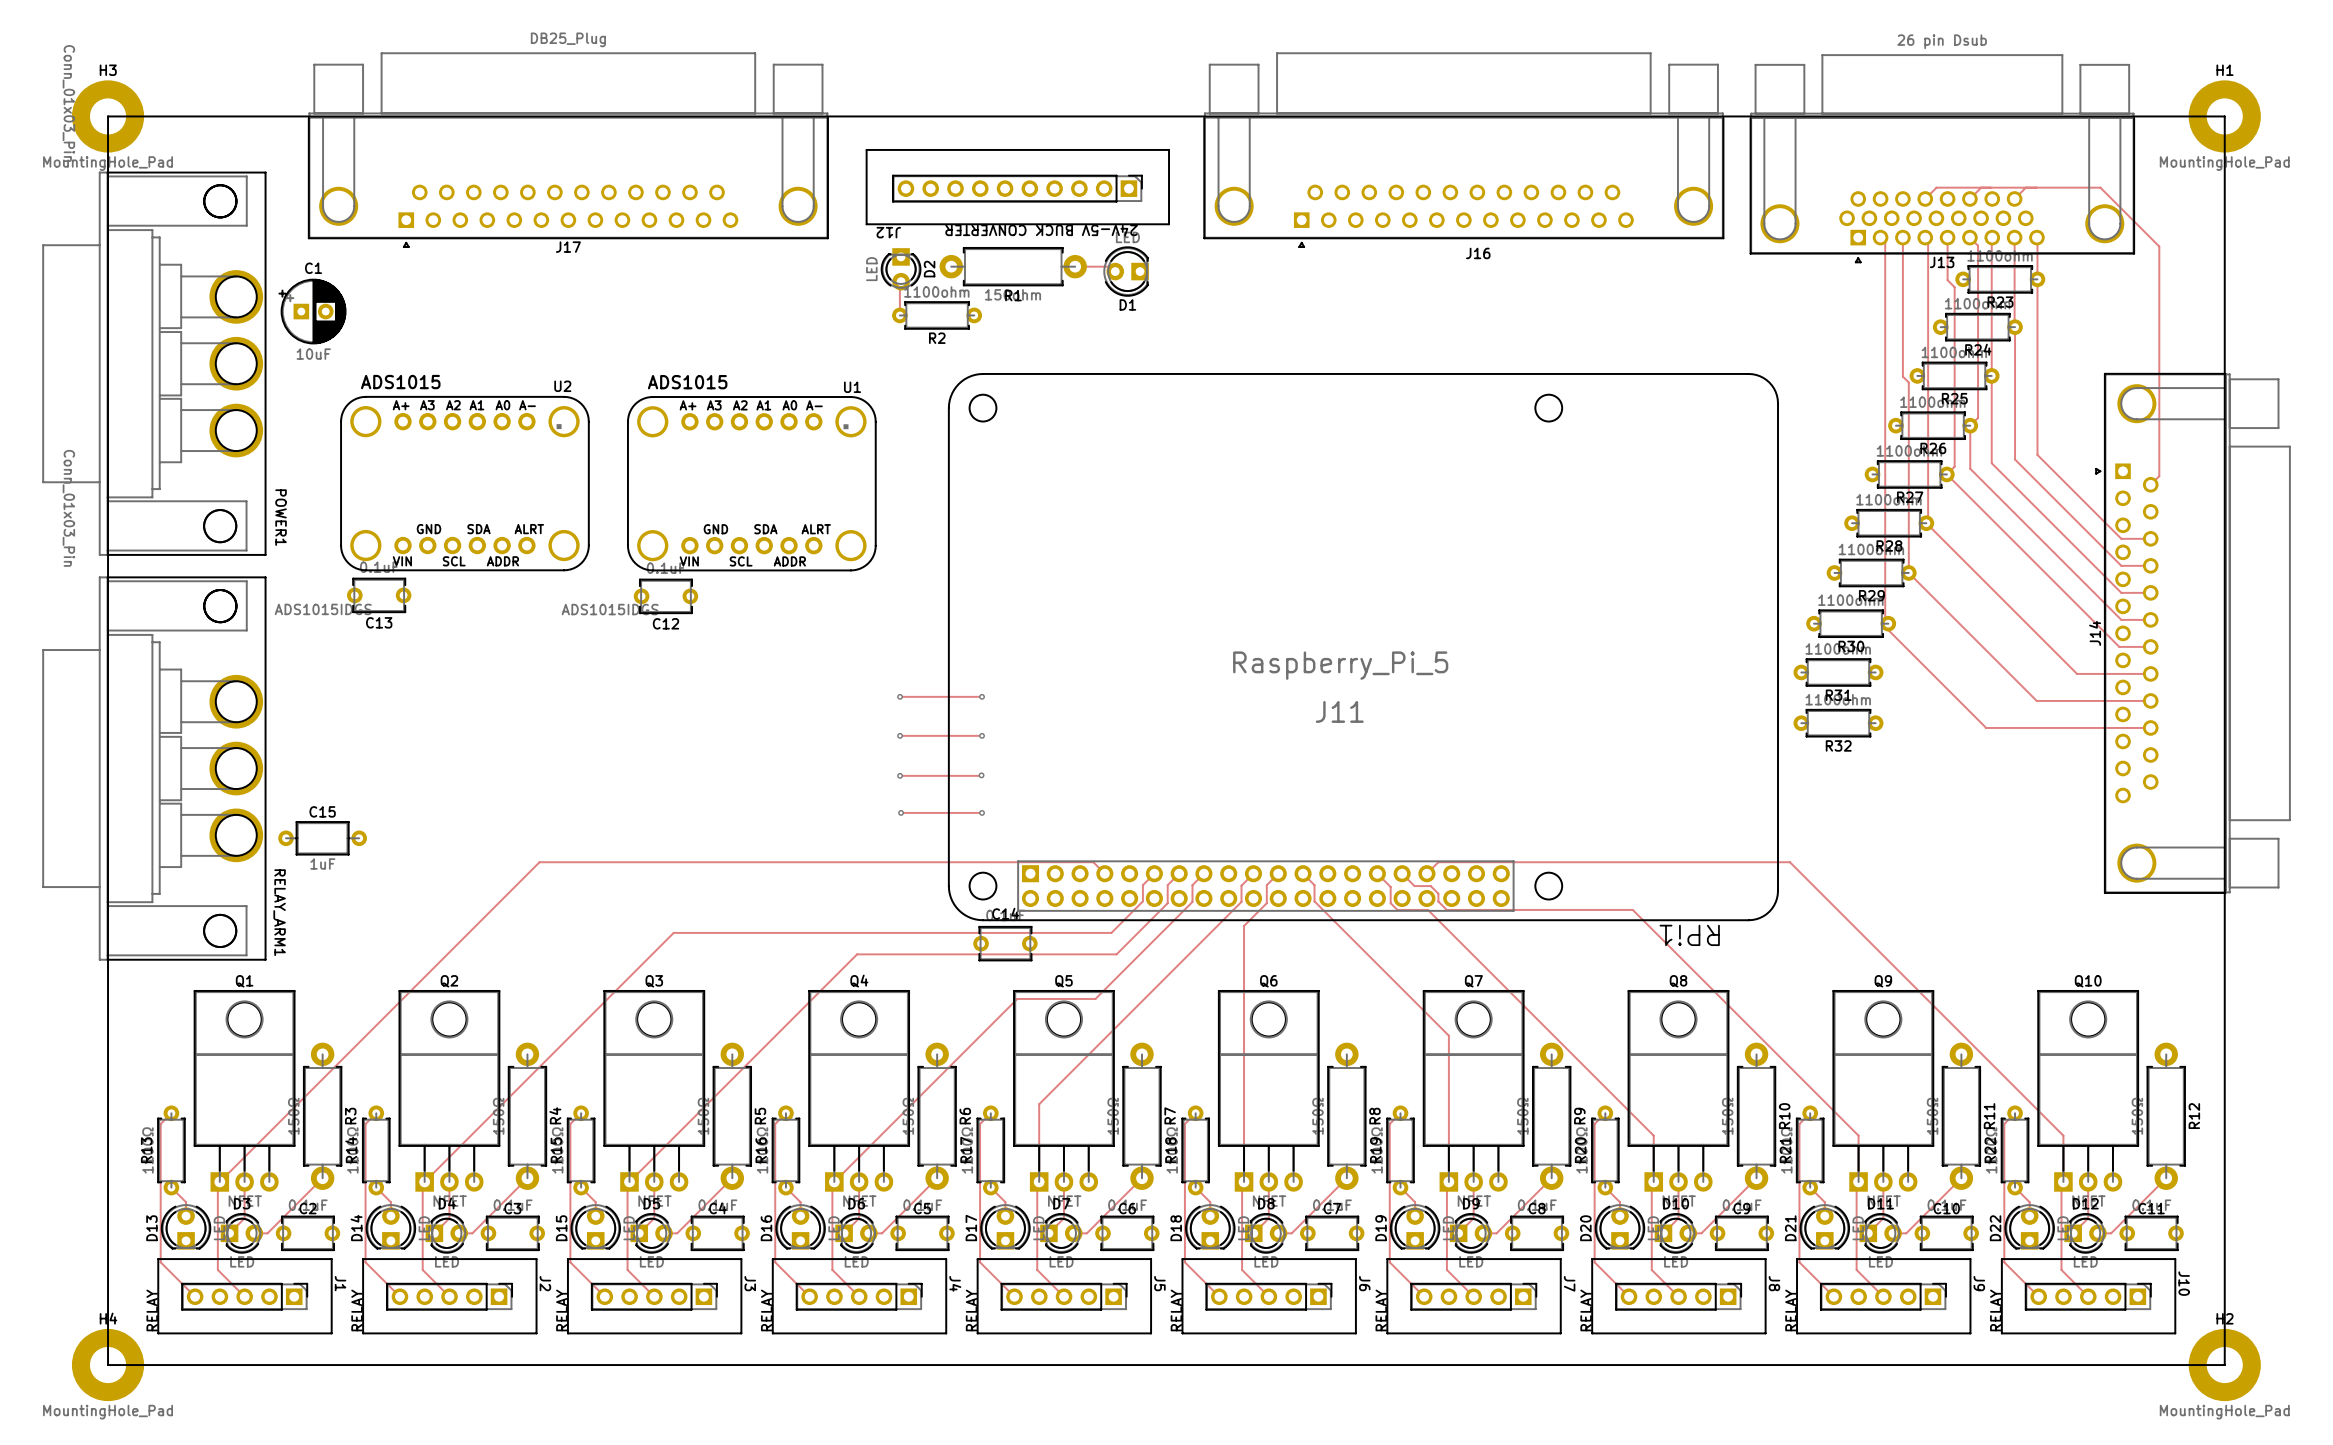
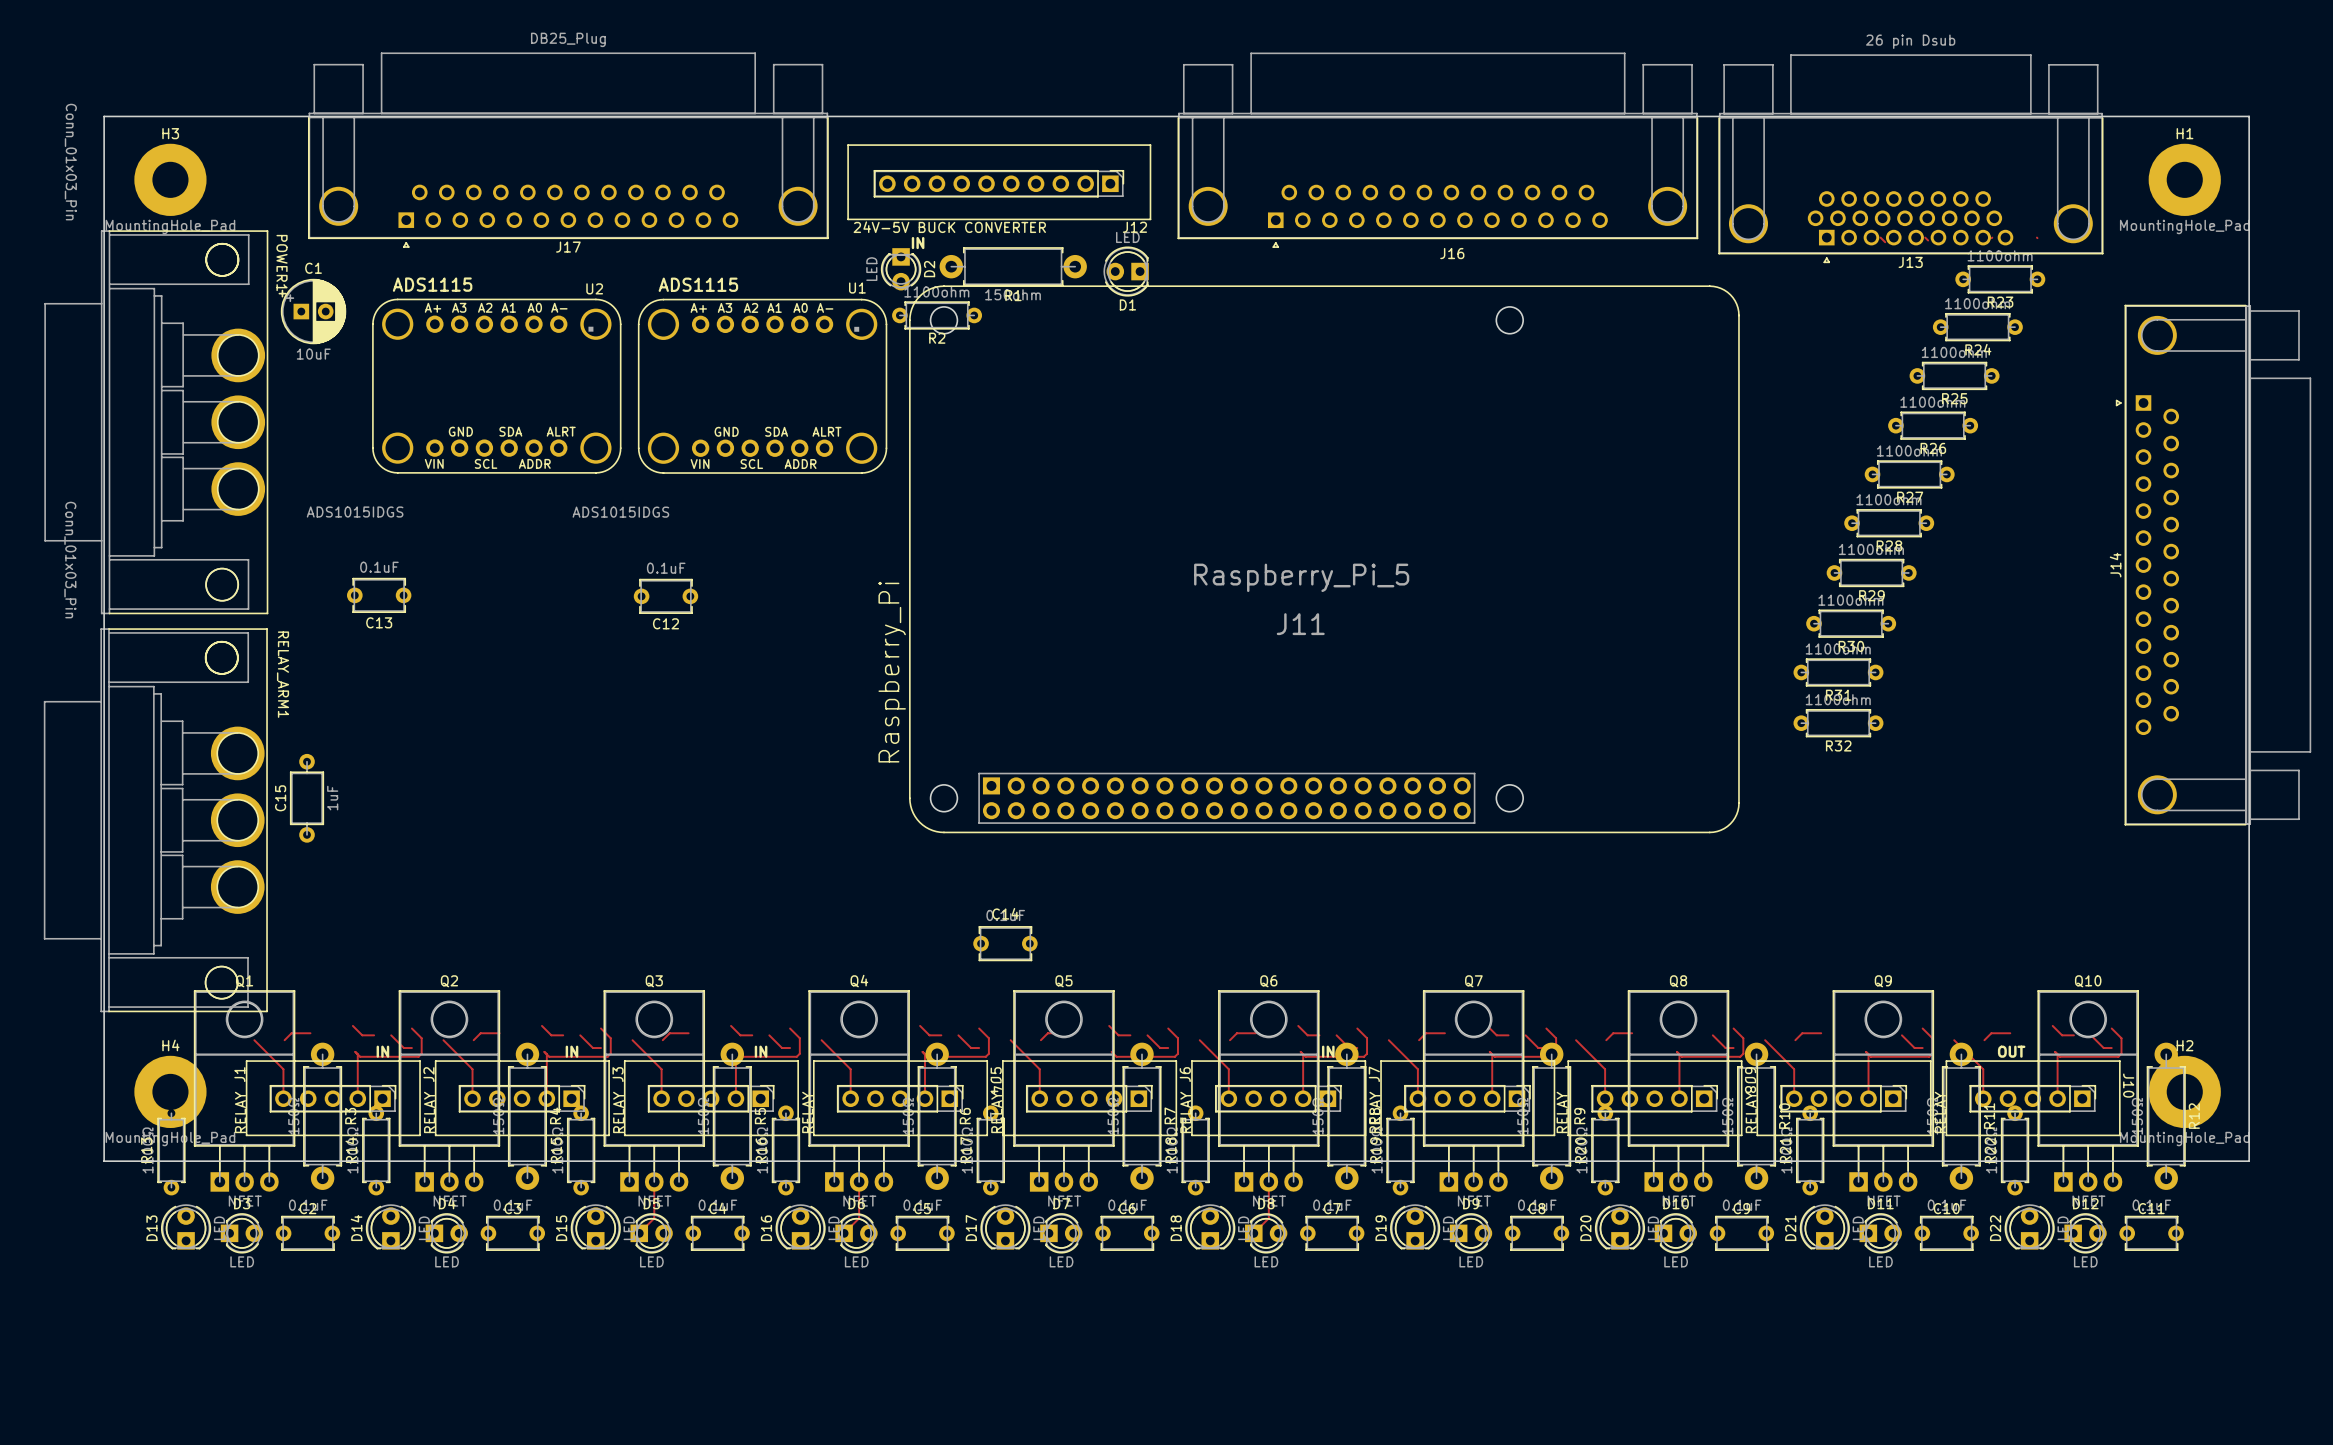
board edge: (108, 116) (108, 1365) (2224, 1365) (2224, 116) -> (108, 116) (104, 116) (104, 1161) (2249, 1161) (2249, 116) (2224, 116)
H3 position: (108, 116) -> (170, 179)
H1 position: (2224, 116) -> (2184, 179)
J16 position: (1463, 150) -> (1437, 150)
J13 position: (1942, 158) -> (1910, 158)
J12 position: (1017, 187) -> (999, 182)
track: (1981, 187) (1969, 198) -> none
track: (2025, 187) (2014, 198) -> none
track: (1925, 198) (1936, 187) (2100, 187) (2159, 246) (2159, 476) (2150, 484) -> none
J12 text rotation: 0° (1041, 230) -> 180° (949, 227)
J12 name rotation: 0° (888, 232) -> 180° (1134, 227)
J12 name position: J12 (888, 232) -> J12 (1134, 227)
track: (1902, 237) (1902, 376) (1908, 382) (1908, 572) (2036, 700) (2150, 700) -> none
track: (1947, 237) (1947, 280) (1954, 287) (1954, 466) (1946, 474) (2119, 646) (2150, 646) -> none
track: (1969, 237) (1978, 245) (1978, 417) (1970, 425) (1970, 468) (2121, 619) (2150, 619) -> none
track: (2014, 237) (2015, 459) (2121, 565) (2150, 565) -> none
track: (1991, 238) (1991, 463) (2121, 592) (2150, 592) -> none
track: (2037, 238) (2037, 454) (2121, 538) (2150, 538) -> none
track: (1928, 240) (1928, 521) (1926, 523) (2077, 673) (2150, 673) -> none
track: (1885, 242) (1885, 620) (1888, 623) (1888, 630) (1986, 727) (2150, 727) -> none
text: none -> IN (918, 243)
track: (1075, 266) (1110, 266) (1115, 271) -> none
track: (901, 281) (899, 315) -> none
POWER1 position: (154, 363) -> (156, 422)
U2 text: ADS1015 (400, 382) -> ADS1115 (432, 284)
U1 text: ADS1015 (687, 382) -> ADS1115 (698, 284)
U1 name position: U1 (852, 387) -> U1 (857, 288)
U2 position: (464, 483) -> (496, 386)
U1 position: (751, 483) -> (762, 386)
POWER1 name position: POWER1 (281, 517) -> POWER1 (282, 263)
J14 position: (2192, 633) -> (2213, 565)
J11 position: (1363, 647) -> (1324, 559)
J11 text: none -> Raspberry_Pi (892, 672)
track: (900, 696) (982, 696) -> none
via: (900, 696) -> none
via: (982, 696) -> none
track: (900, 735) (982, 735) -> none
via: (900, 735) -> none
via: (982, 735) -> none
RELAY_ARM1 position: (154, 768) -> (155, 820)
via: (900, 775) -> none
track: (981, 775) (900, 775) -> none
via: (981, 775) -> none
C15 name position: C15 (322, 811) -> C15 (280, 798)
track: (901, 812) (982, 812) -> none
via: (901, 812) -> none
via: (982, 812) -> none
C15 rotation: 0° (322, 838) -> 90° clockwise (307, 798)
C15 value position: 1uF (322, 863) -> 1uF (332, 798)
track: (1104, 873) (1093, 862) (539, 862) (217, 1183) (217, 1269) (244, 1296) -> none
track: (1154, 873) (1142, 885) (1142, 901) (1111, 932) (673, 932) (422, 1183) (422, 1269) (449, 1296) -> none
track: (1179, 873) (1167, 885) (1167, 903) (1116, 954) (857, 954) (627, 1183) (627, 1269) (654, 1296) -> none
track: (1203, 873) (1192, 885) (1192, 901) (1095, 998) (1017, 998) (832, 1183) (832, 1269) (859, 1296) -> none
track: (1253, 873) (1241, 885) (1241, 901) (1039, 1104) (1037, 1269) (1064, 1296) -> none
track: (1278, 873) (1266, 885) (1266, 903) (1244, 926) (1242, 1269) (1268, 1296) -> none
track: (1303, 873) (1314, 885) (1314, 901) (1448, 1035) (1446, 1269) (1473, 1296) -> none
track: (1377, 873) (1390, 887) (1390, 903) (1397, 909) (1427, 909) (1653, 1135) (1651, 1269) (1678, 1296) -> none
track: (1402, 873) (1414, 886) (1430, 886) (1438, 893) (1438, 901) (1446, 909) (1632, 909) (1858, 1135) (1856, 1269) (1883, 1296) -> none
track: (1426, 873) (1438, 862) (1789, 862) (2063, 1135) (2061, 1269) (2088, 1296) -> none
RELAY_ARM1 name position: RELAY_ARM1 (279, 912) -> RELAY_ARM1 (283, 674)
J11 text: RPi1 (1689, 935) -> none
track: none -> (352, 1025) (362, 1035) (374, 1035)
track: none -> (541, 1025) (551, 1035) (563, 1035)
track: none -> (731, 1025) (740, 1035) (752, 1035)
track: none -> (920, 1025) (929, 1035) (941, 1035)
track: none -> (1109, 1025) (1118, 1035) (1130, 1035)
track: none -> (1298, 1025) (1307, 1035) (1319, 1035)
track: none -> (1487, 1025) (1496, 1035) (1508, 1035)
track: none -> (2052, 1025) (2062, 1035) (2073, 1035)
track: none -> (411, 1028) (421, 1038) (421, 1053) (418, 1056) (360, 1056) (355, 1051)
track: none -> (600, 1028) (610, 1038) (610, 1053) (607, 1056) (549, 1056) (544, 1051)
track: none -> (790, 1028) (799, 1038) (799, 1053) (796, 1056) (738, 1056) (733, 1051)
track: none -> (979, 1028) (988, 1038) (988, 1053) (985, 1056) (927, 1056) (922, 1051)
track: none -> (1168, 1028) (1177, 1038) (1177, 1053) (1174, 1056) (1116, 1056) (1111, 1051)
track: none -> (1357, 1028) (1367, 1038) (1367, 1053) (1363, 1056) (1305, 1056) (1300, 1051)
track: none -> (1546, 1028) (1556, 1038) (1556, 1053) (1553, 1056) (1494, 1056) (1489, 1051)
track: none -> (1733, 1028) (1743, 1038) (1743, 1053) (1740, 1056) (1681, 1056) (1677, 1051)
track: none -> (1922, 1028) (1932, 1038) (1932, 1053) (1929, 1056) (1870, 1056) (1866, 1051)
track: none -> (2111, 1028) (2121, 1038) (2121, 1053) (2118, 1056) (2060, 1056) (2055, 1051)
track: none -> (310, 1033) (291, 1033) (284, 1040)
track: none -> (499, 1033) (480, 1033) (473, 1040)
track: none -> (688, 1033) (669, 1033) (662, 1040)
track: none -> (1066, 1033) (1047, 1033) (1040, 1040)
track: none -> (1255, 1033) (1236, 1033) (1230, 1040)
track: none -> (1444, 1033) (1426, 1033) (1419, 1040)
track: none -> (1632, 1033) (1613, 1033) (1606, 1040)
track: none -> (1821, 1033) (1802, 1033) (1795, 1040)
track: none -> (2010, 1033) (1991, 1033) (1984, 1040)
track: none -> (391, 1035) (403, 1048) (411, 1048)
track: none -> (580, 1035) (592, 1048) (600, 1048)
track: none -> (769, 1035) (782, 1048) (790, 1048)
track: none -> (958, 1035) (971, 1048) (979, 1048)
track: none -> (1147, 1035) (1160, 1048) (1168, 1048)
track: none -> (1336, 1035) (1349, 1048) (1357, 1048)
track: none -> (1525, 1035) (1538, 1048) (1546, 1048)
track: none -> (1712, 1035) (1725, 1048) (1733, 1048)
track: none -> (1901, 1035) (1914, 1048) (1922, 1048)
track: none -> (2091, 1035) (2103, 1048) (2111, 1048)
track: none -> (254, 1040) (283, 1069) (283, 1098)
track: none -> (443, 1040) (472, 1069) (472, 1098)
track: none -> (632, 1040) (661, 1069) (661, 1098)
track: none -> (821, 1040) (850, 1069) (850, 1098)
track: none -> (1010, 1040) (1039, 1069) (1039, 1098)
track: none -> (1199, 1040) (1228, 1069) (1228, 1098)
track: none -> (1388, 1040) (1417, 1069) (1417, 1098)
track: none -> (1576, 1040) (1605, 1069) (1605, 1098)
track: none -> (1765, 1040) (1794, 1069) (1794, 1098)
track: none -> (1954, 1040) (1983, 1069) (1983, 1098)
text: none -> IN (382, 1051)
text: none -> IN (571, 1051)
text: none -> IN (761, 1051)
text: none -> IN (1328, 1051)
text: none -> OUT (2011, 1051)
track: none -> (357, 1054) (357, 1098)
track: none -> (546, 1054) (546, 1098)
track: none -> (735, 1054) (735, 1098)
track: none -> (925, 1054) (925, 1098)
track: none -> (1303, 1054) (1303, 1098)
track: none -> (1492, 1054) (1492, 1098)
track: none -> (1679, 1054) (1679, 1098)
track: none -> (1868, 1054) (1868, 1098)
track: none -> (2057, 1054) (2057, 1098)
track: (171, 1113) (160, 1124) (160, 1262) (195, 1296) -> none
track: (376, 1113) (365, 1124) (365, 1262) (399, 1296) -> none
track: (581, 1113) (570, 1124) (570, 1262) (604, 1296) -> none
track: (785, 1113) (775, 1124) (775, 1262) (809, 1296) -> none
track: (990, 1113) (980, 1124) (980, 1262) (1014, 1296) -> none
track: (1195, 1113) (1184, 1124) (1184, 1262) (1219, 1296) -> none
track: (1400, 1113) (1389, 1124) (1389, 1262) (1424, 1296) -> none
track: (1605, 1113) (1594, 1124) (1594, 1262) (1629, 1296) -> none
track: (1810, 1113) (1799, 1124) (1799, 1262) (1833, 1296) -> none
track: (2015, 1113) (2004, 1124) (2004, 1262) (2038, 1296) -> none
track: (322, 1178) (267, 1233) (254, 1233) -> none
track: (527, 1178) (472, 1233) (459, 1233) -> none
track: (732, 1178) (677, 1233) (664, 1233) -> none
track: (937, 1178) (882, 1233) (868, 1233) -> none
track: (1142, 1178) (1086, 1233) (1073, 1233) -> none
track: (1346, 1178) (1291, 1233) (1278, 1233) -> none
track: (1551, 1178) (1496, 1233) (1483, 1233) -> none
track: (1756, 1178) (1701, 1233) (1688, 1233) -> none
track: (1961, 1178) (1906, 1233) (1893, 1233) -> none
track: (2166, 1178) (2111, 1233) (2097, 1233) -> none
track: (244, 1181) (244, 1218) (229, 1233) -> none
track: (449, 1181) (449, 1218) (434, 1233) -> none
track: (1063, 1181) (1063, 1218) (1048, 1233) -> none
track: (1473, 1181) (1473, 1218) (1458, 1233) -> none
track: (1678, 1181) (1678, 1218) (1663, 1233) -> none
track: (1883, 1181) (1883, 1218) (1868, 1233) -> none
track: (2088, 1181) (2088, 1218) (2073, 1233) -> none
track: (171, 1187) (186, 1202) (186, 1216) -> none
track: (376, 1187) (390, 1202) (390, 1216) -> none
track: (581, 1187) (595, 1202) (595, 1216) -> none
track: (785, 1187) (800, 1202) (800, 1216) -> none
track: (990, 1187) (1005, 1202) (1005, 1216) -> none
track: (1195, 1187) (1210, 1202) (1210, 1216) -> none
track: (1400, 1187) (1415, 1202) (1415, 1216) -> none
track: (1605, 1187) (1619, 1202) (1619, 1216) -> none
track: (1810, 1187) (1824, 1202) (1824, 1216) -> none
track: (2015, 1187) (2029, 1202) (2029, 1216) -> none
J1 name rotation: 0° (340, 1283) -> 180° (239, 1074)
J1 name position: J1 (340, 1283) -> J1 (239, 1074)
J2 name rotation: 0° (545, 1283) -> 180° (428, 1074)
J2 name position: J2 (545, 1283) -> J2 (428, 1074)
J3 name rotation: 0° (750, 1283) -> 180° (618, 1074)
J3 name position: J3 (750, 1283) -> J3 (618, 1074)
J5 name rotation: 0° (1159, 1283) -> 180° (996, 1074)
J5 name position: J5 (1159, 1283) -> J5 (996, 1074)
J6 name rotation: 0° (1364, 1283) -> 180° (1185, 1074)
J6 name position: J6 (1364, 1283) -> J6 (1185, 1074)
J7 name rotation: 0° (1569, 1283) -> 180° (1374, 1074)
J7 name position: J7 (1569, 1283) -> J7 (1374, 1074)
J9 name rotation: 0° (1979, 1283) -> 180° (1750, 1074)
J9 name position: J9 (1979, 1283) -> J9 (1750, 1074)
J1 position: (244, 1296) -> (333, 1098)
J2 position: (449, 1296) -> (522, 1098)
J3 position: (654, 1296) -> (711, 1098)
J4 position: (859, 1296) -> (900, 1098)
J5 position: (1064, 1296) -> (1089, 1098)
J6 position: (1269, 1296) -> (1278, 1098)
J7 position: (1474, 1296) -> (1467, 1098)
J8 position: (1678, 1296) -> (1654, 1098)
J9 position: (1883, 1296) -> (1844, 1098)
J10 position: (2088, 1296) -> (2033, 1098)
H4 position: (108, 1365) -> (170, 1091)
H2 position: (2224, 1365) -> (2184, 1091)

